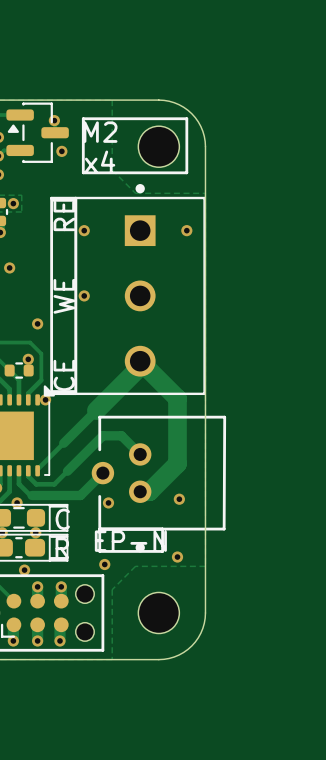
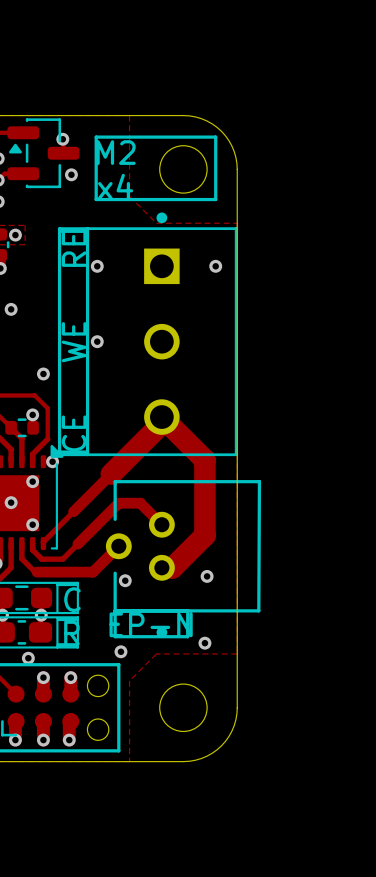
via: none -> (32, 481)
via: none -> (11, 502)
via: none -> (32, 524)
via: (17, 502) -> none

